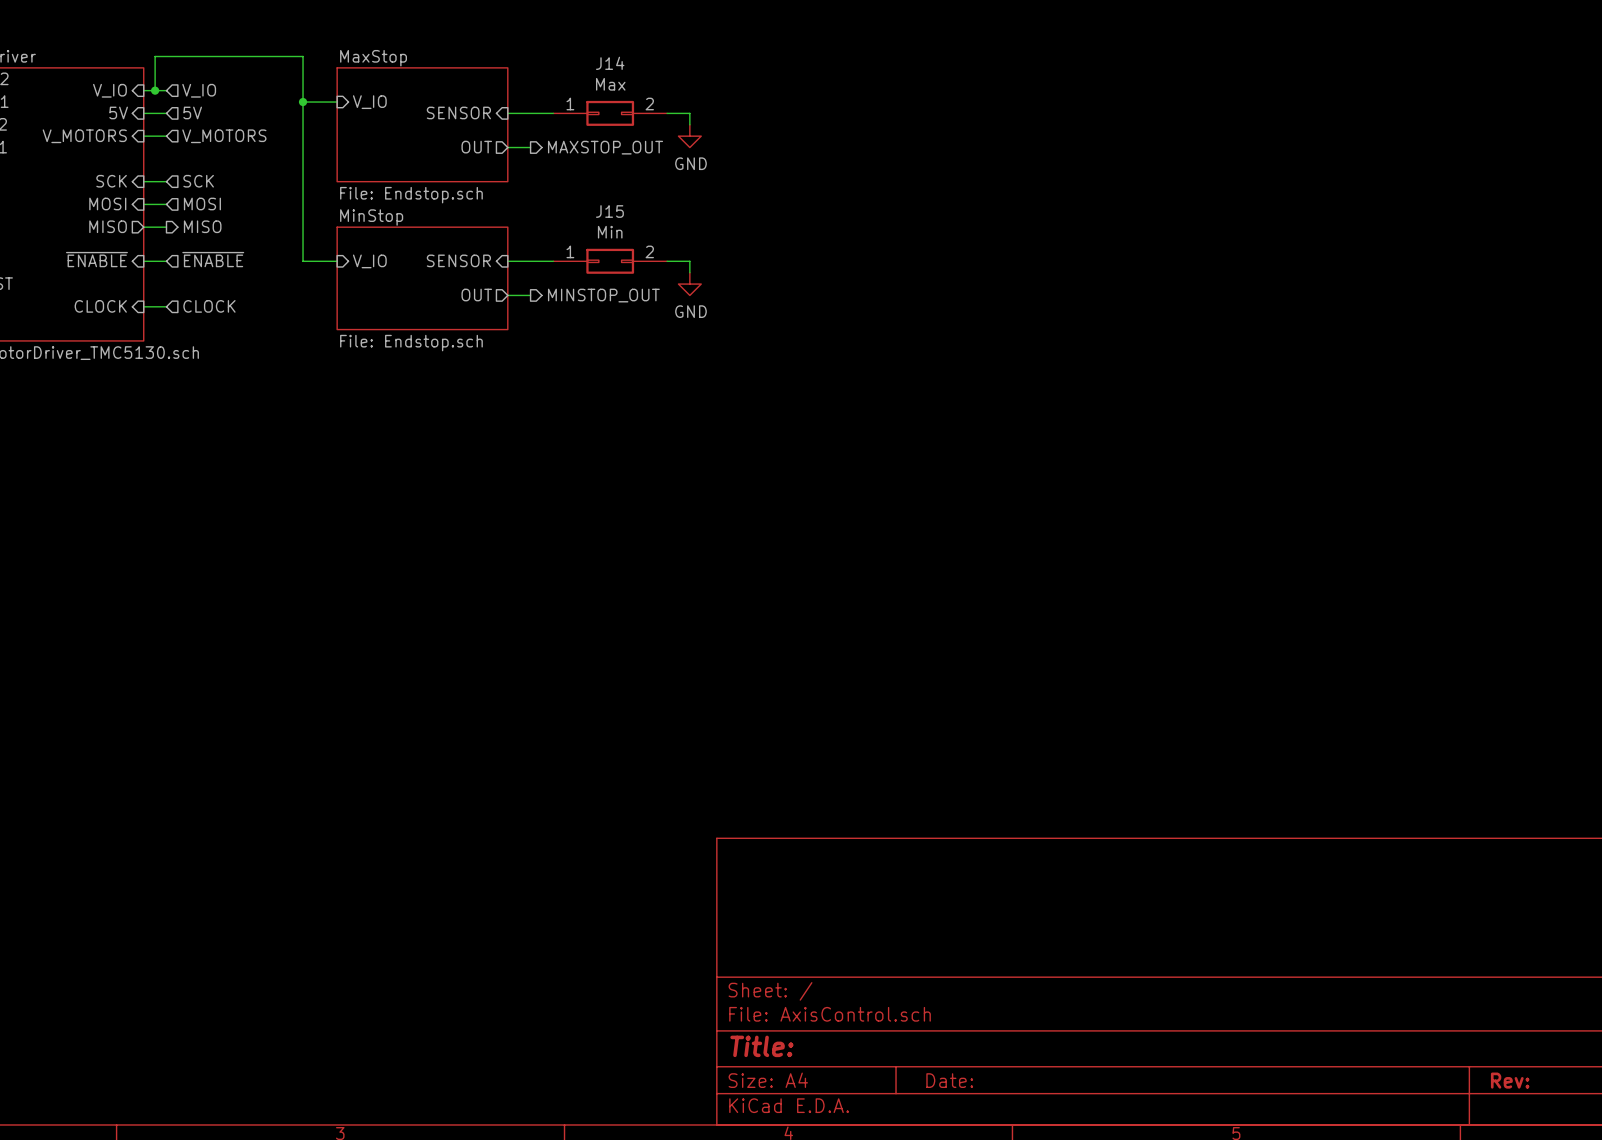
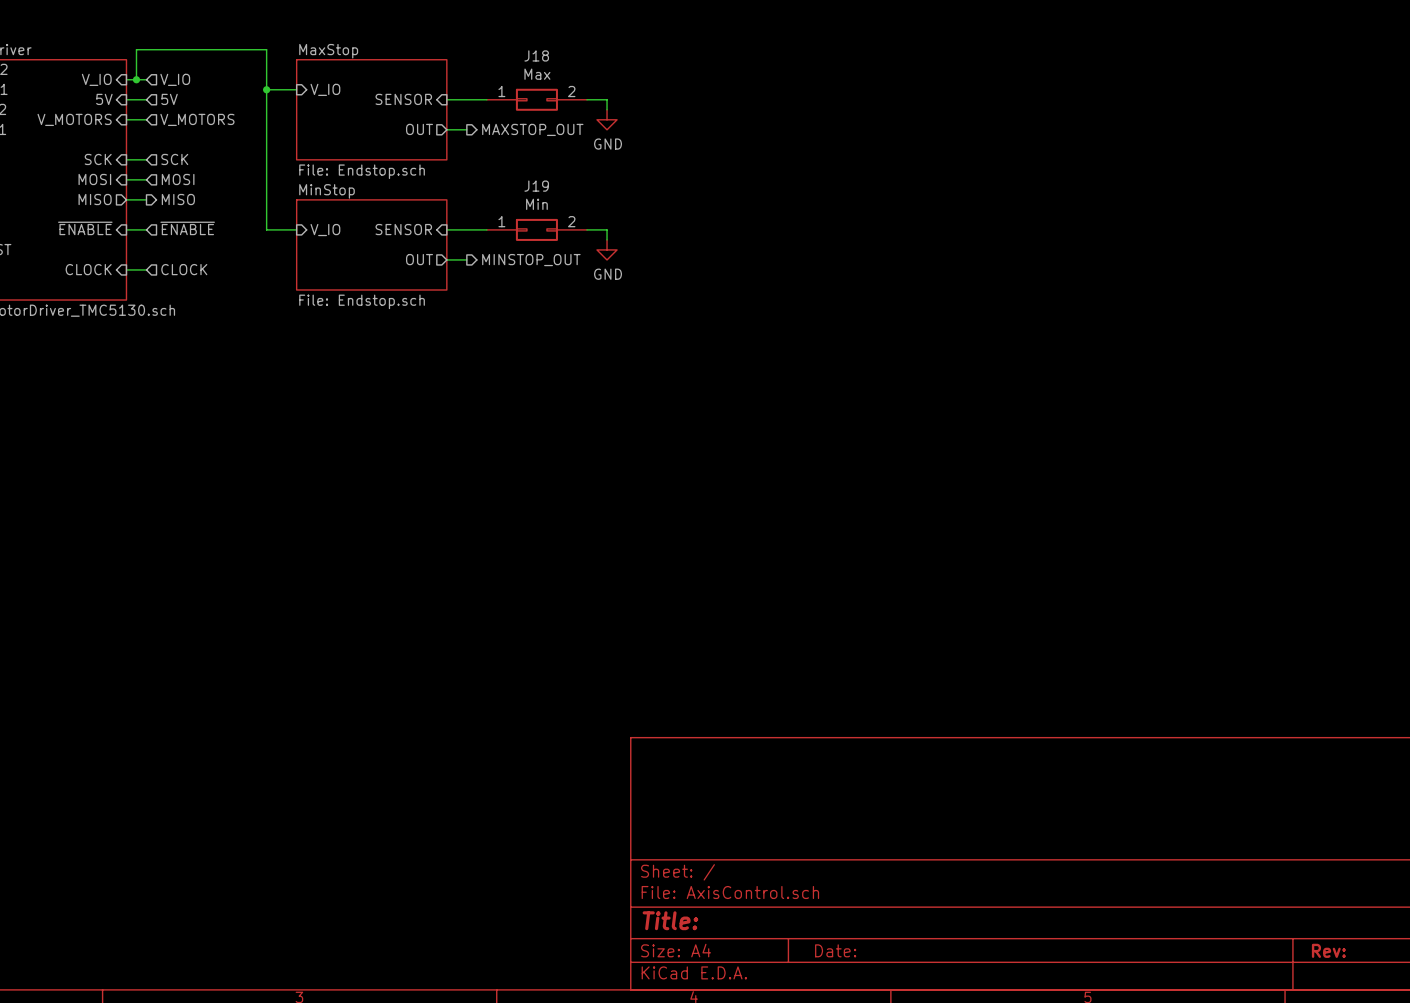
J14 name: J14 (610, 63) -> J18 (536, 55)
J15 name: J15 (609, 211) -> J19 (536, 186)

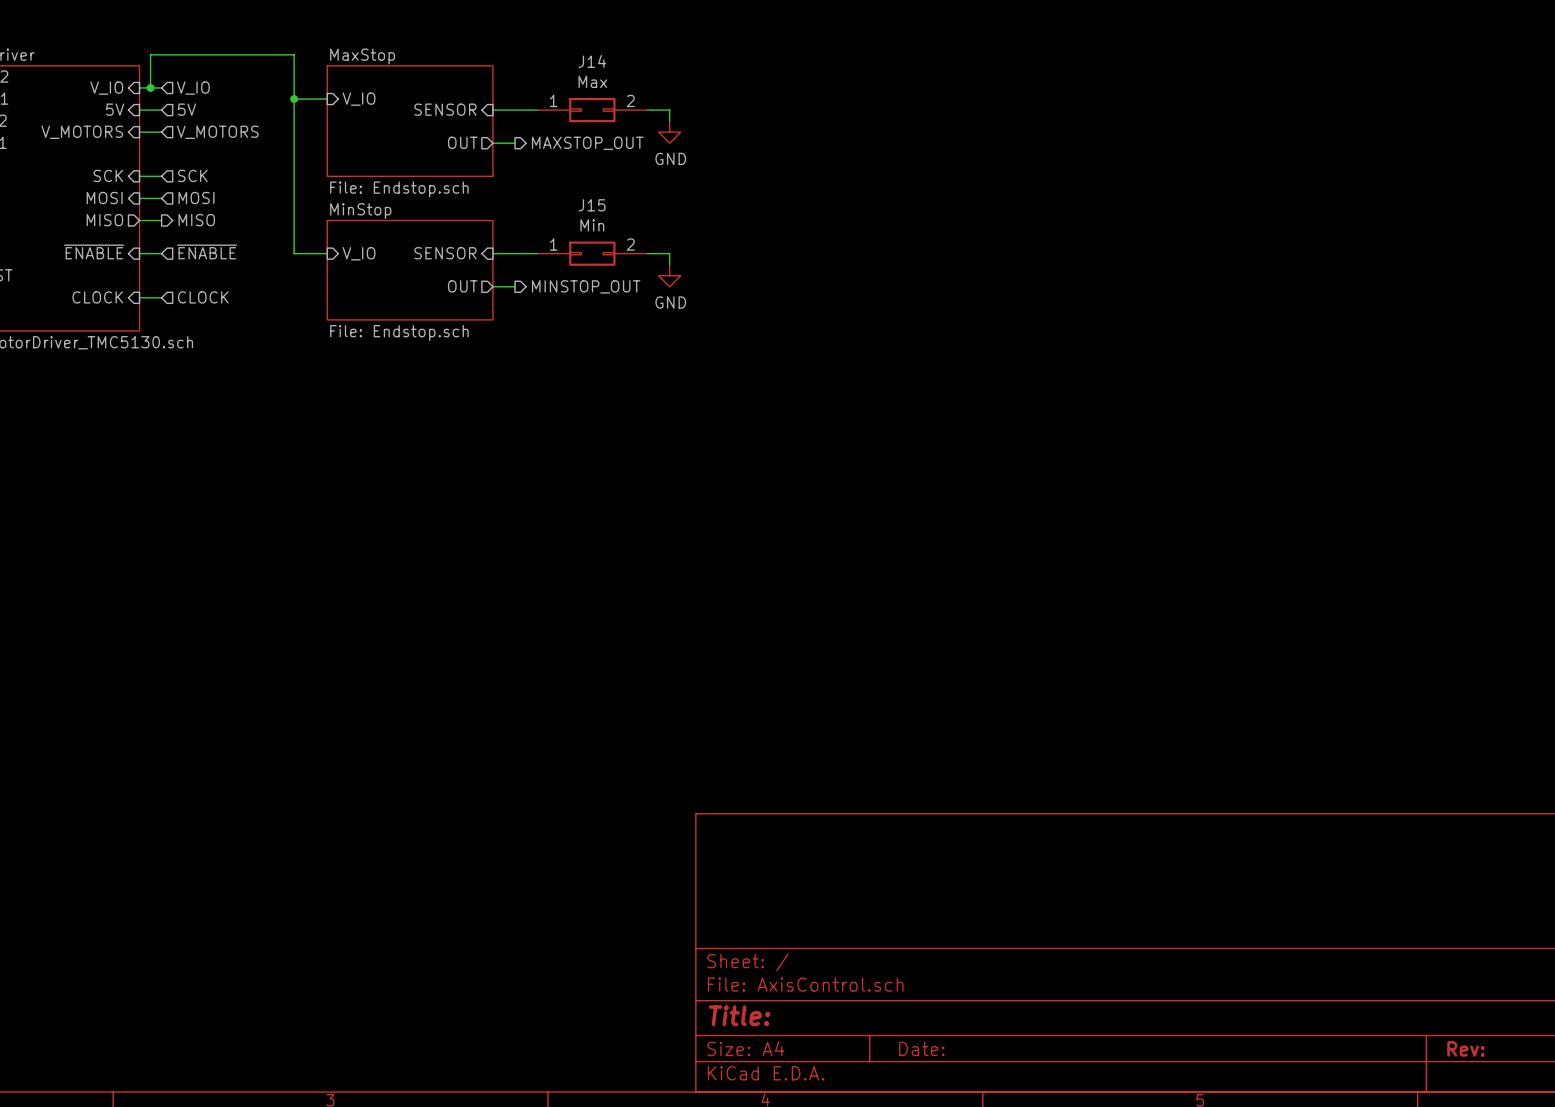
J18 name: J18 (536, 55) -> J14 (592, 61)
J19 name: J19 (536, 186) -> J15 (592, 205)

